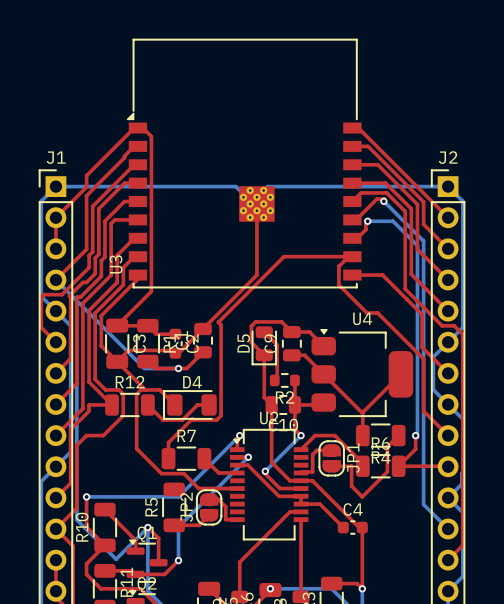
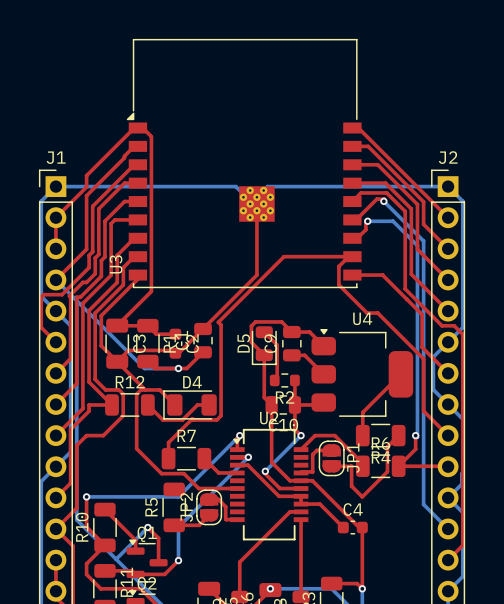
top track: (323, 374) (362, 412) -> none
bottom track: (147, 527) (147, 590) -> (116, 559) (147, 590)

